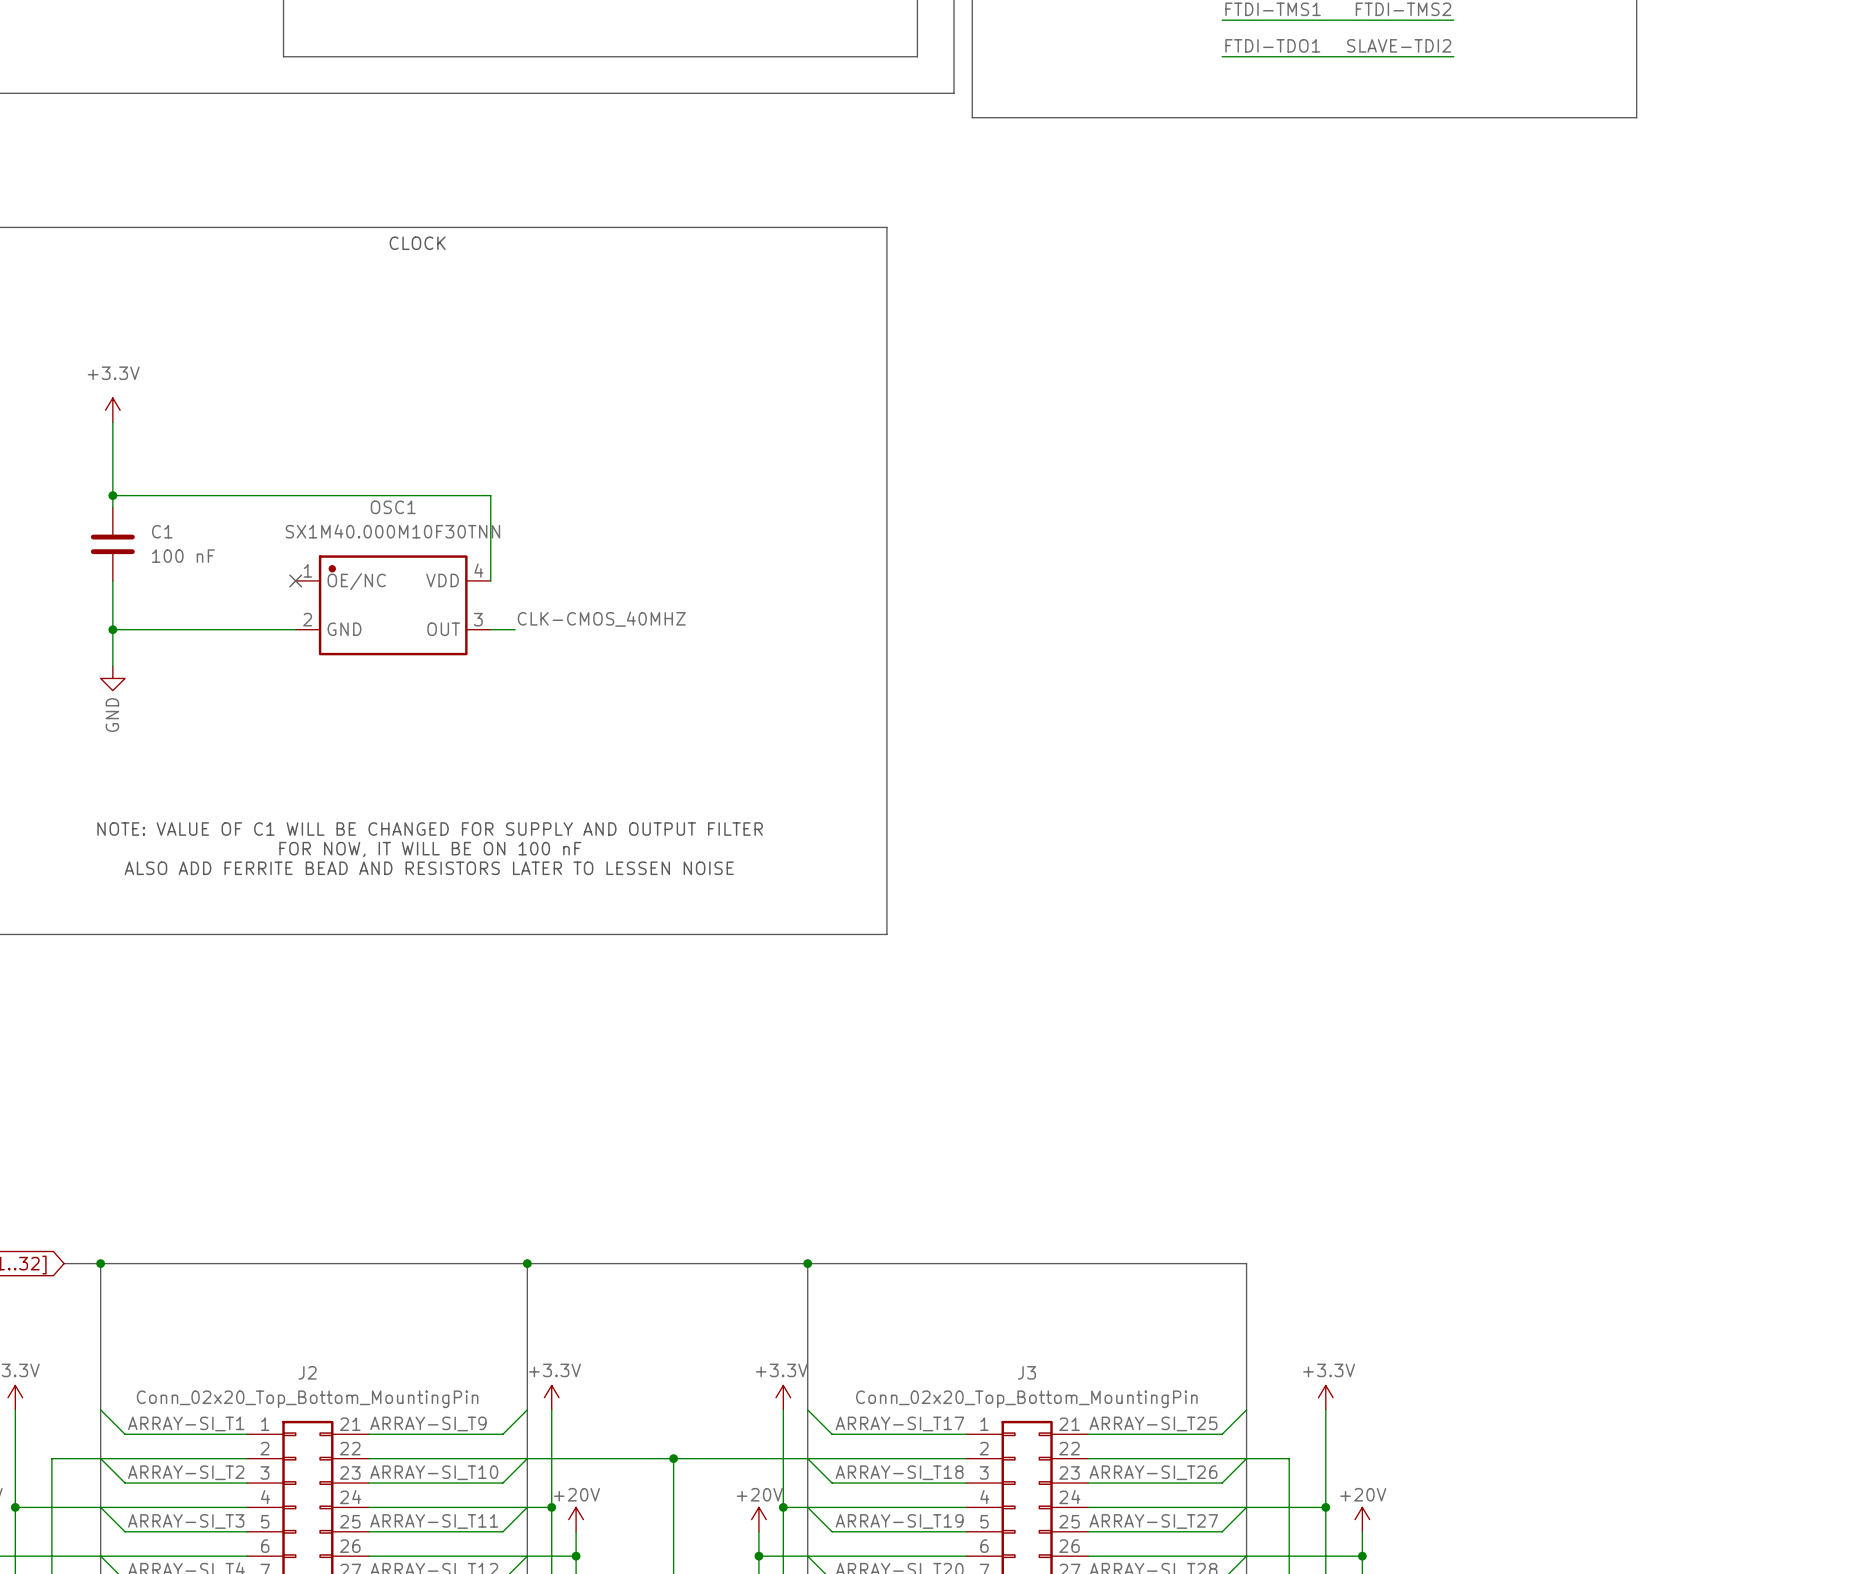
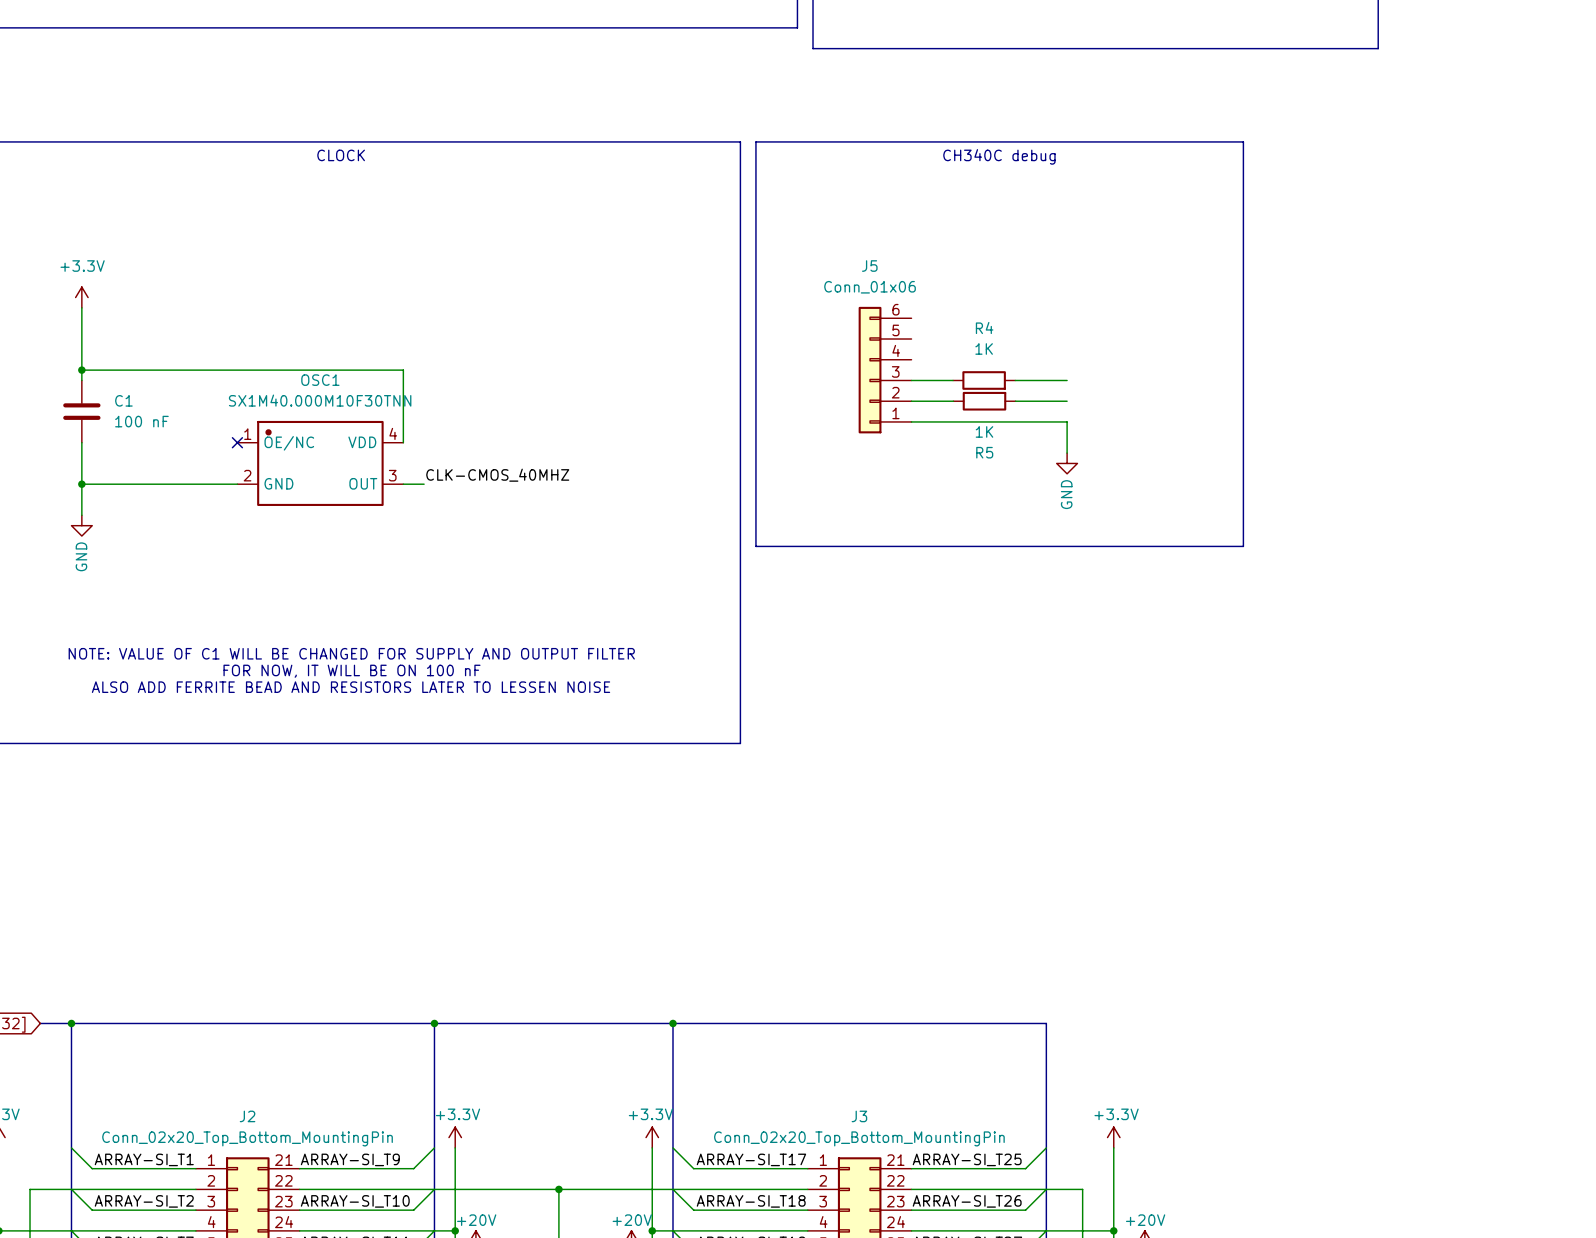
line: none -> (755, 141) (1243, 141) (1243, 546) (755, 546) (755, 141)
text: none -> CH340C debug (999, 156)
J5: none -> Conn_01x06 (885, 370)
wire: none -> (911, 380) (953, 380)
R4: none -> 1K (984, 380)
wire: none -> (1015, 380) (1067, 380)
wire: none -> (911, 401) (953, 401)
R5: none -> 1K (984, 401)
wire: none -> (1015, 401) (1067, 401)
wire: none -> (911, 421) (1067, 421) (1067, 453)
power symbol: none -> GND (1067, 463)

